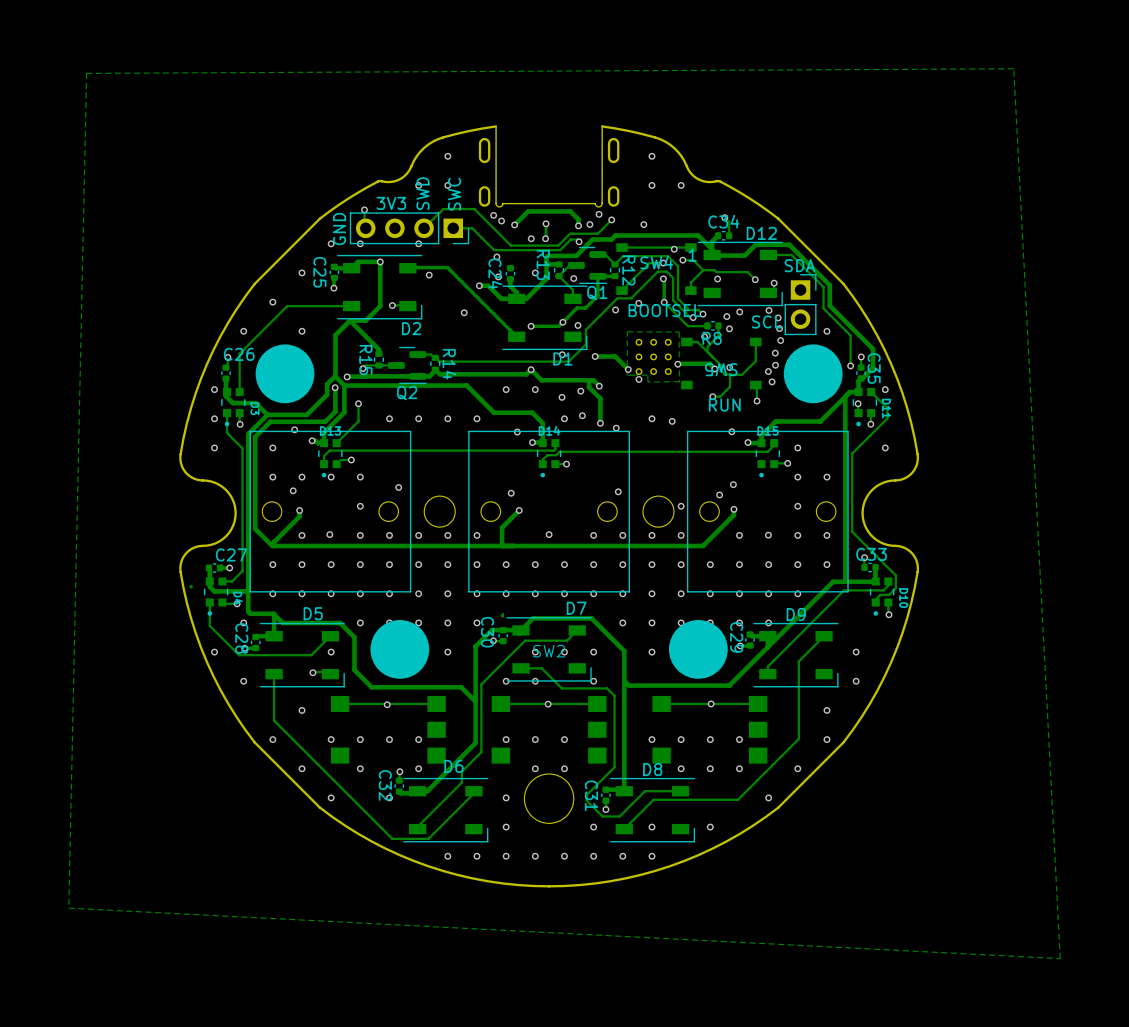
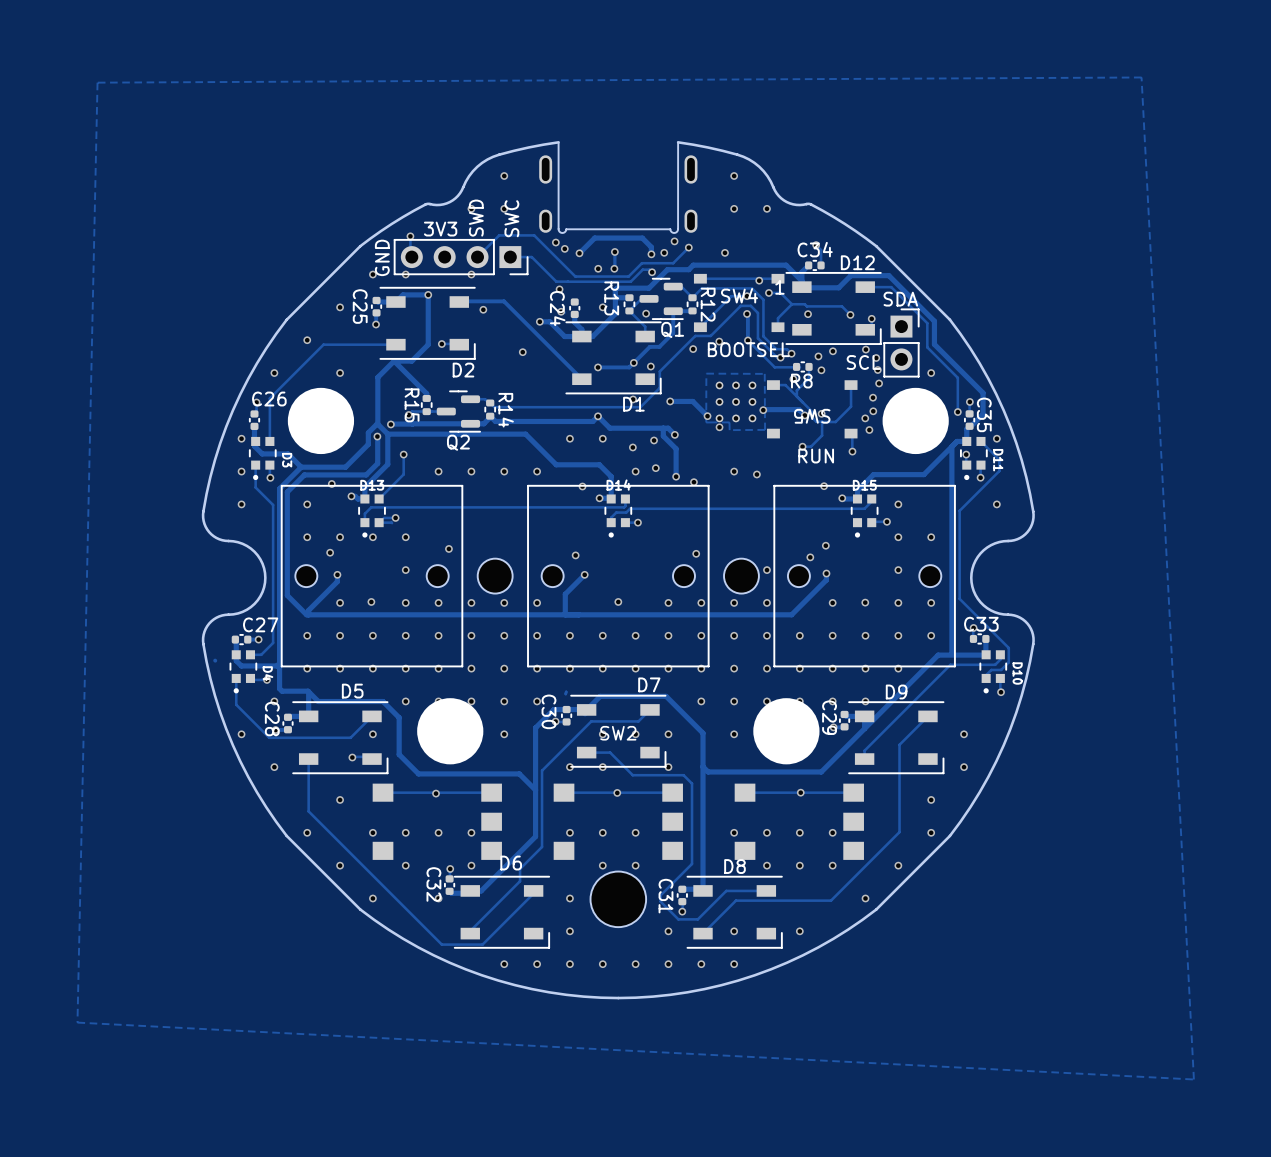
track: none -> (379, 522) (392, 523)

